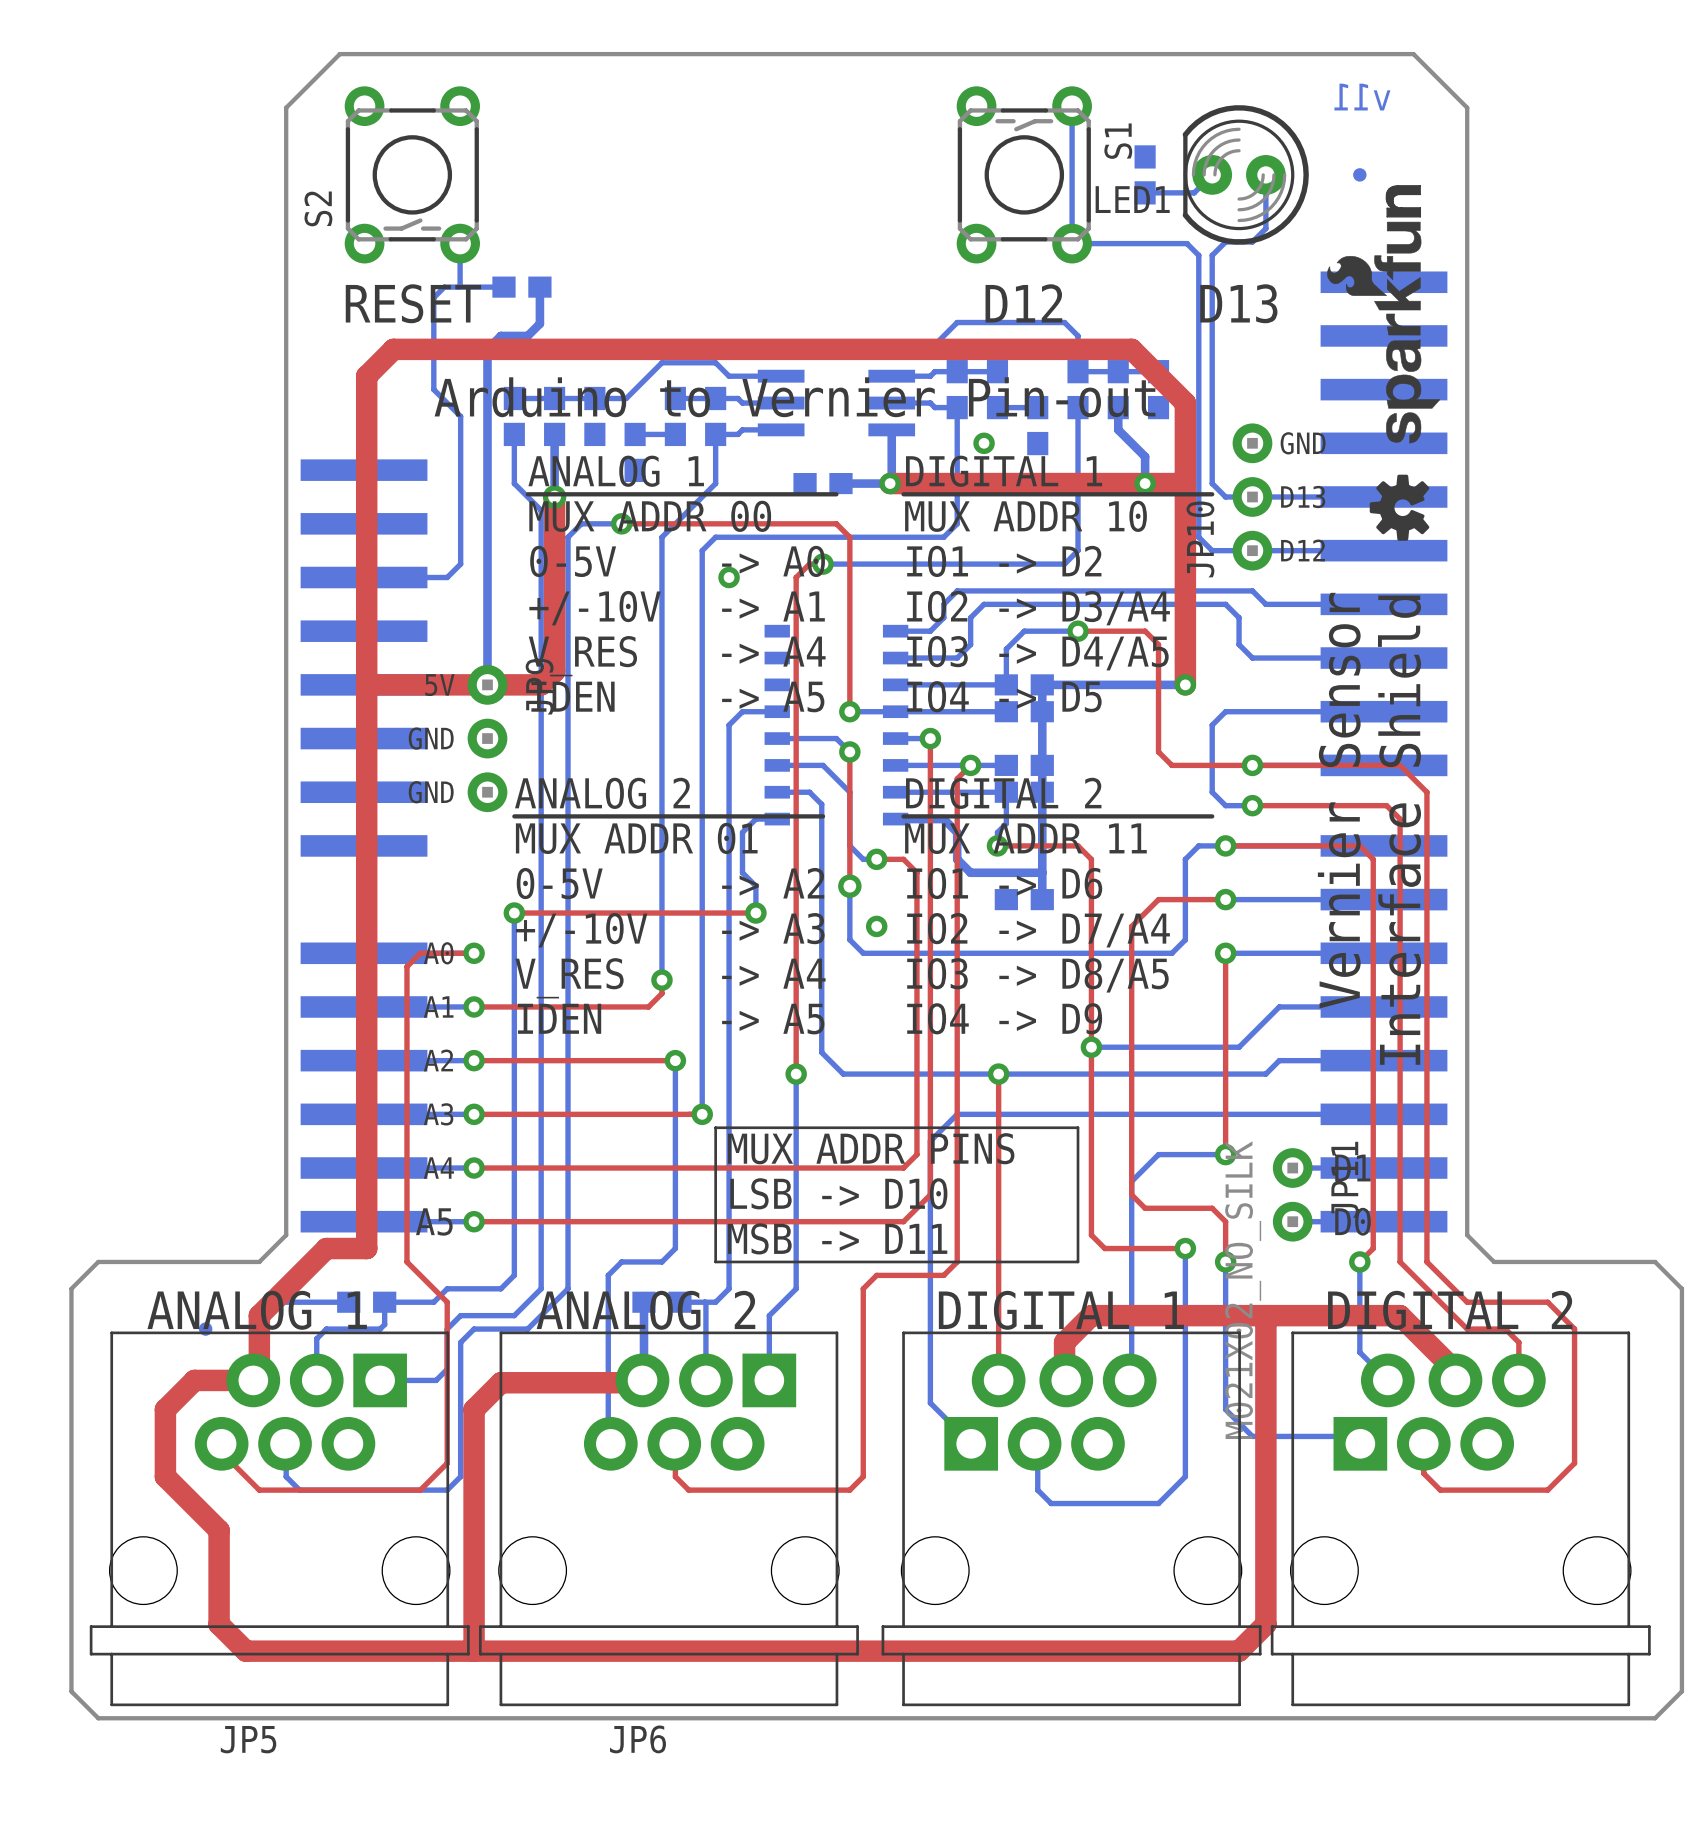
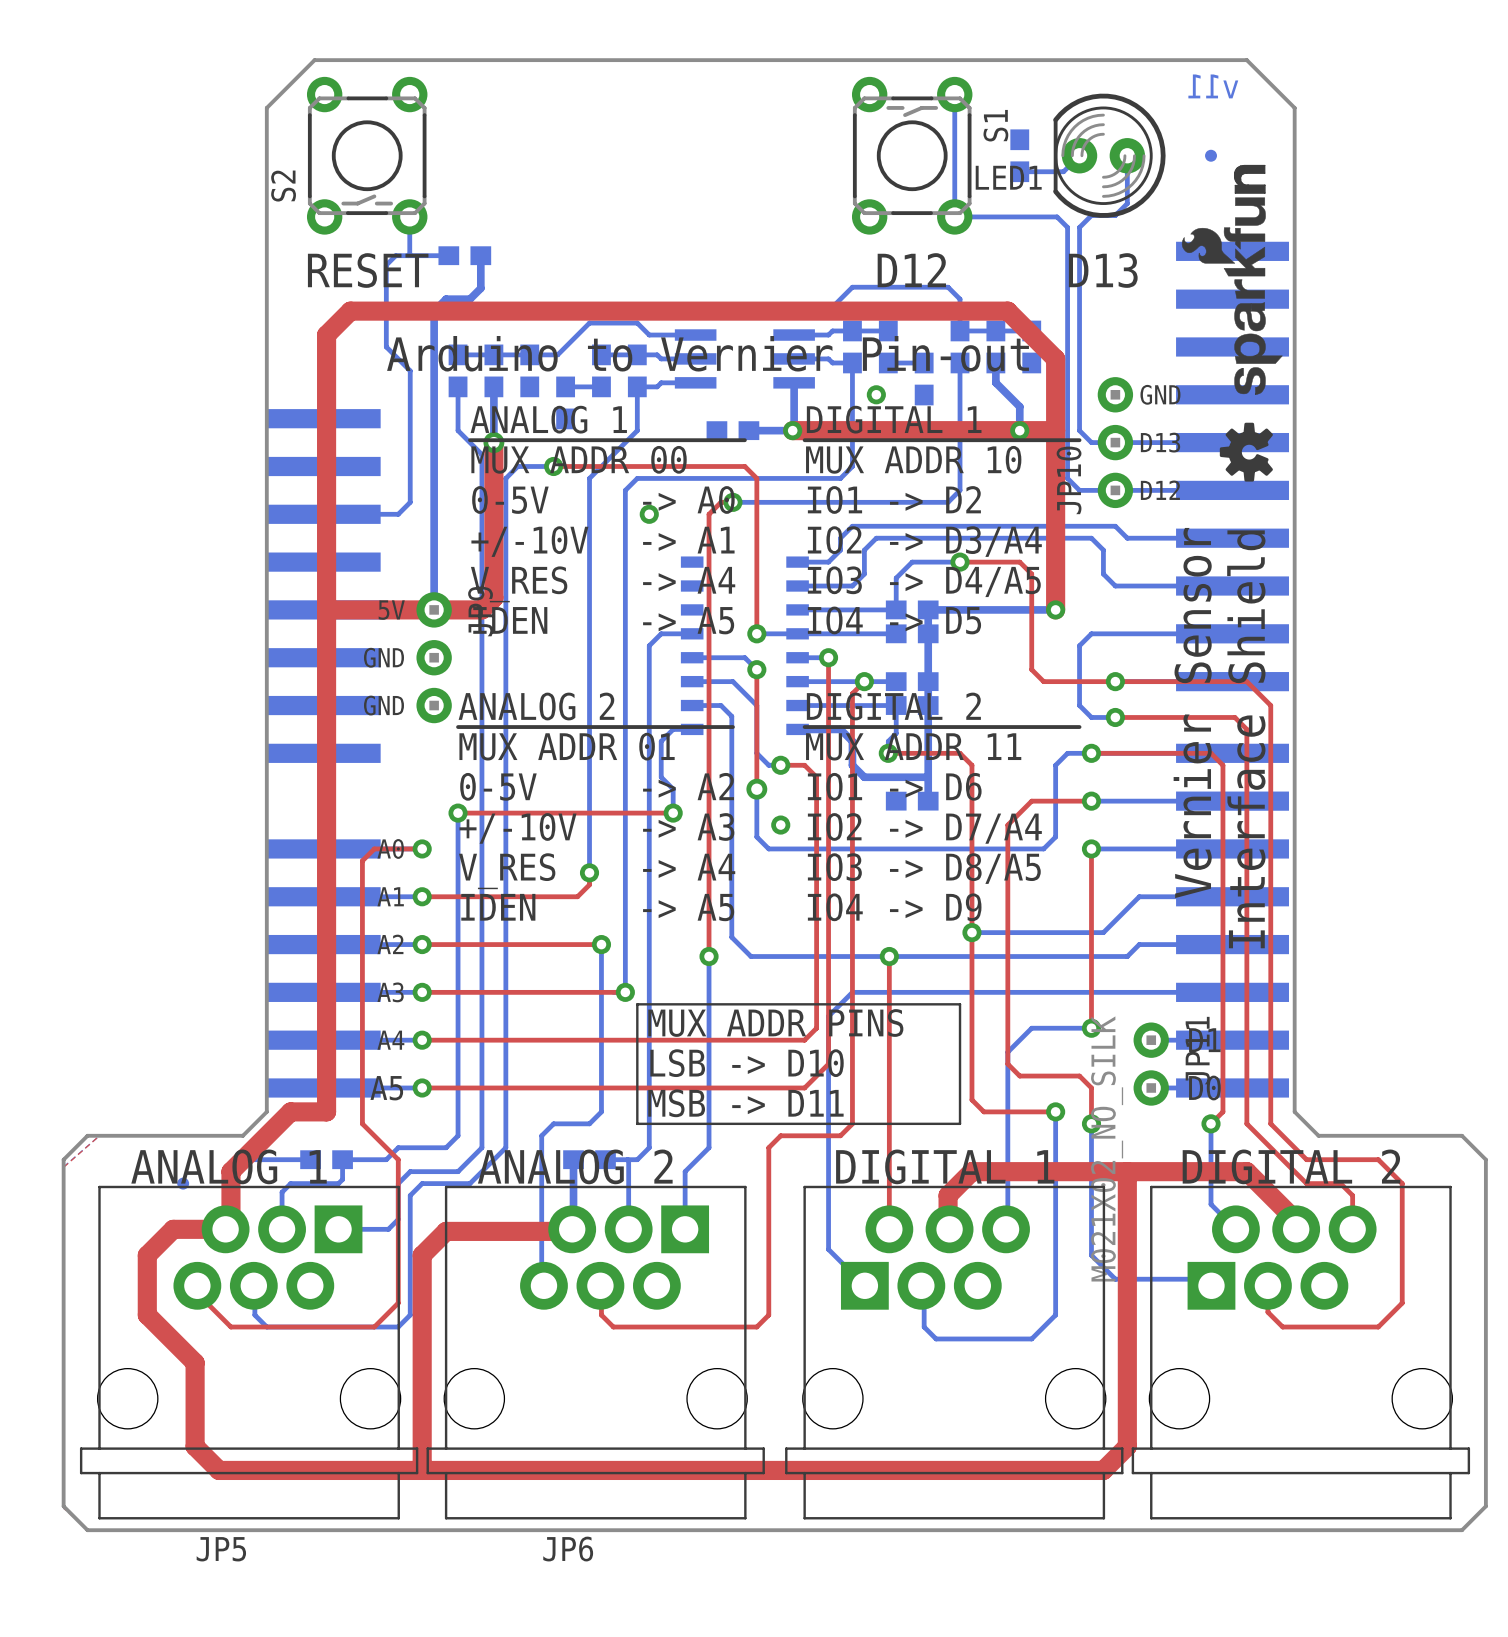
line: (71, 1302) (71, 1288) (98, 1261) (259, 1261) (286, 1235) (286, 107) (339, 54) (1413, 54) (1467, 107) (1467, 1235) (1494, 1261) (1655, 1261) (1681, 1288) (1681, 1691) (1655, 1718) (1641, 1718) -> (63, 1159) (87, 1135) (242, 1135) (266, 1111) (266, 107) (314, 60) (1246, 60) (1294, 107) (1294, 1111) (1318, 1135) (1461, 1135) (1485, 1159) (1485, 1506) (1461, 1530)

